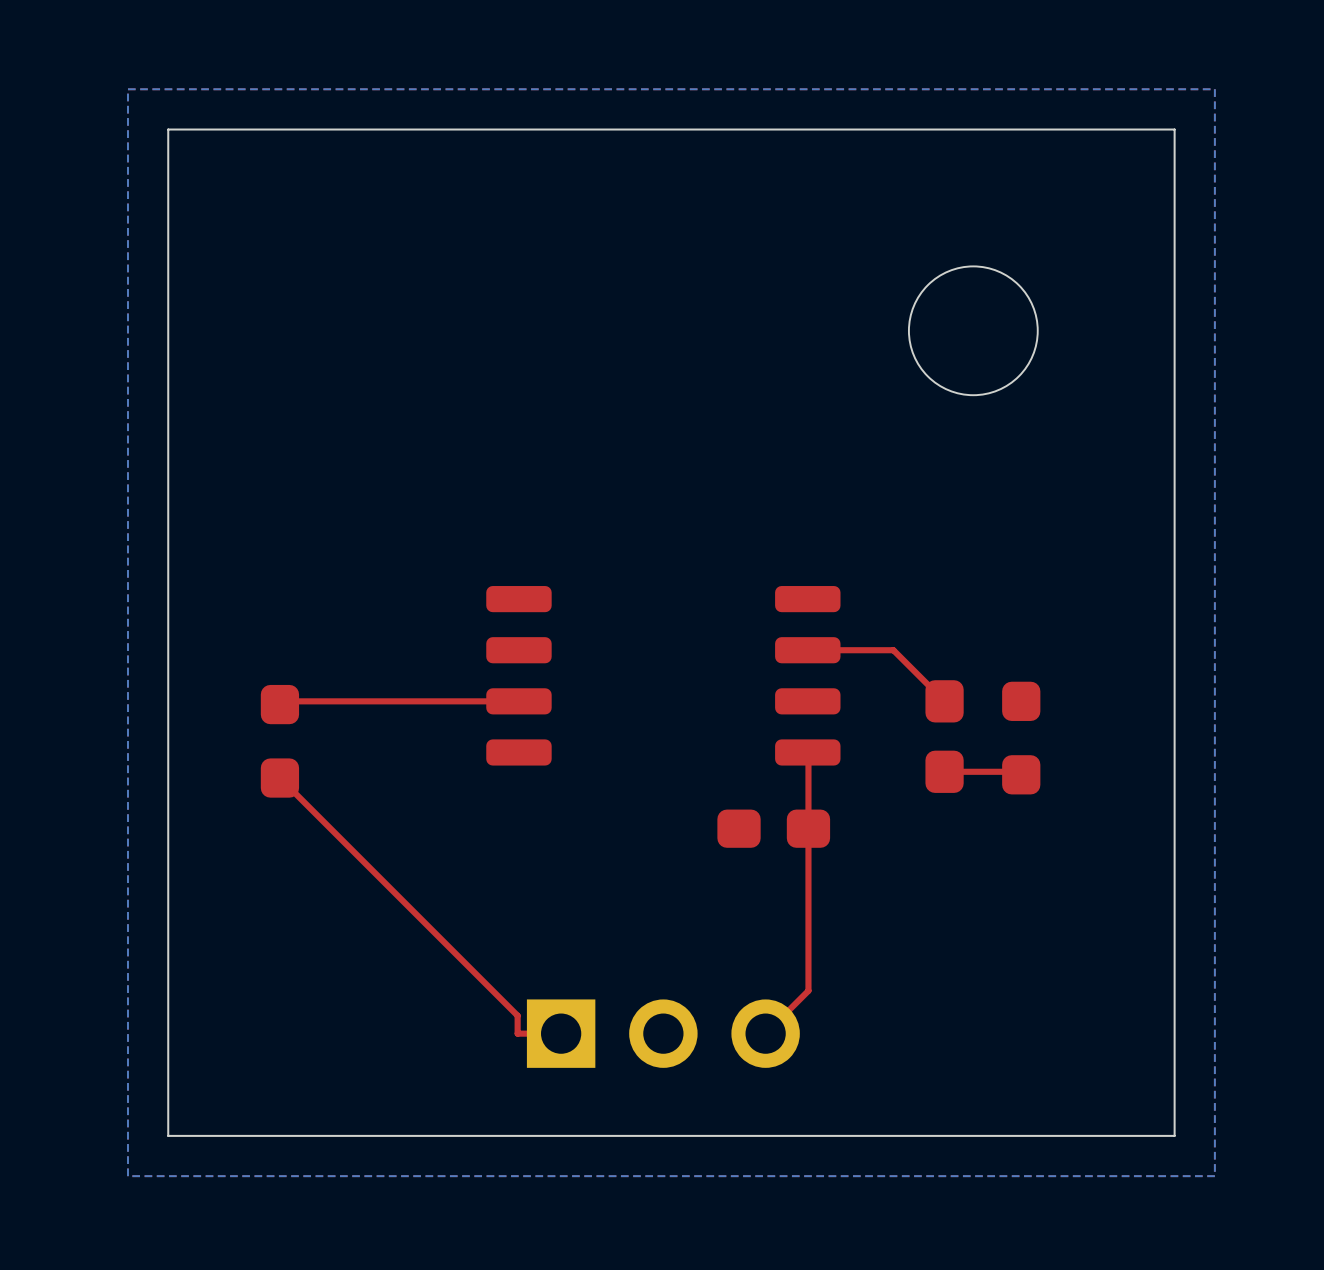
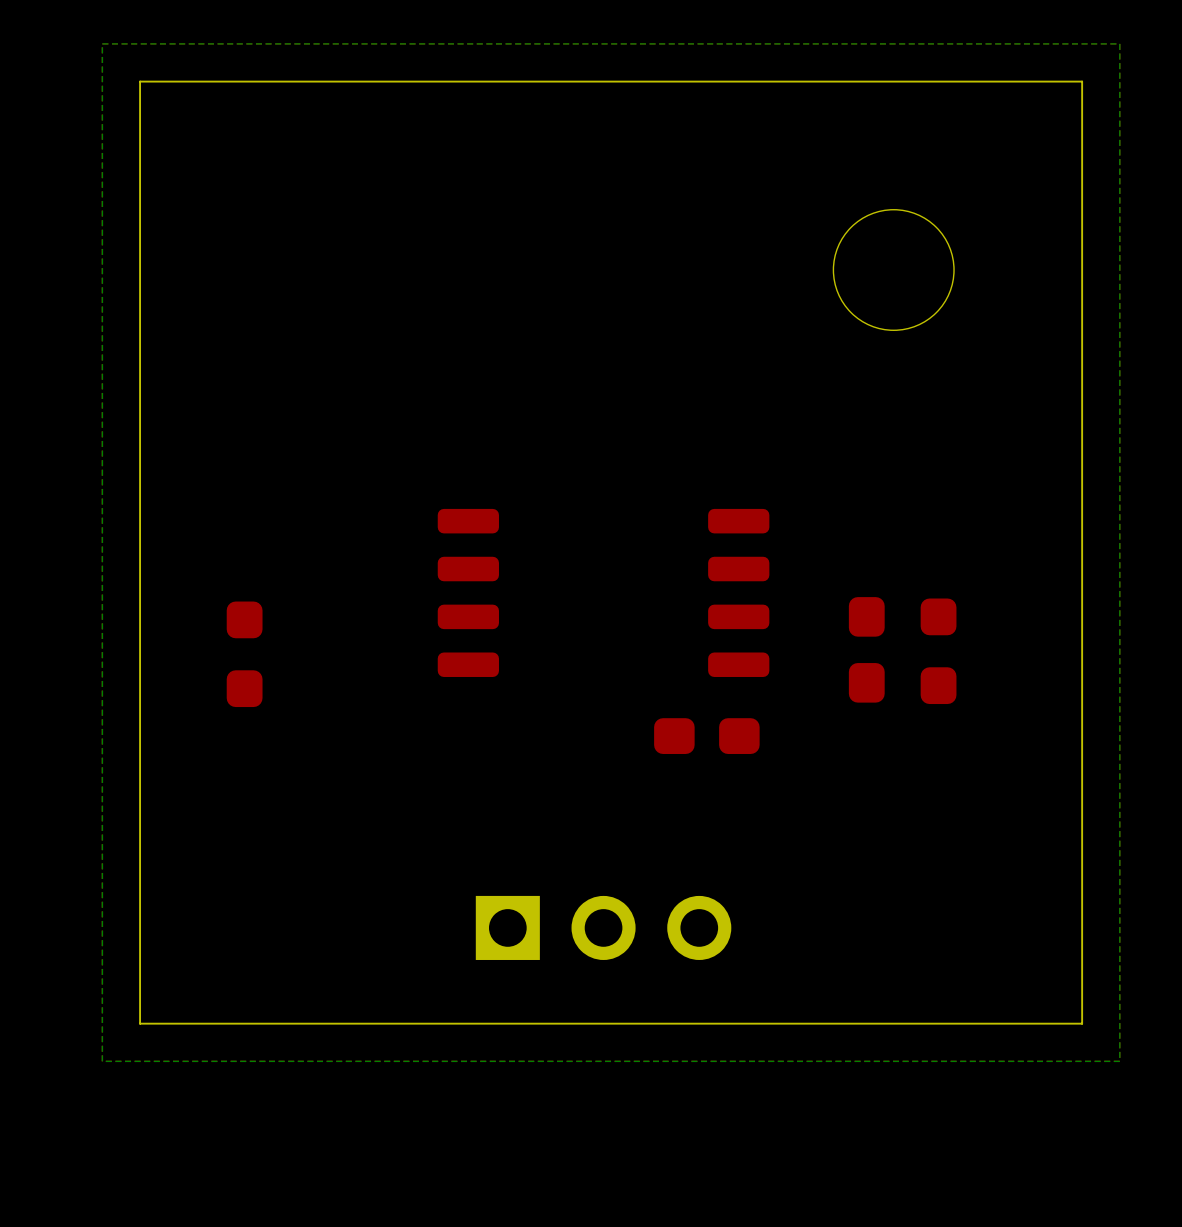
top track: (807, 650) (893, 650) (944, 701) -> none
top track: (518, 701) (283, 701) (279, 704) -> none
top track: (807, 752) (808, 990) (765, 1033) -> none
top track: (944, 771) (1018, 771) (1021, 774) -> none
top track: (279, 778) (517, 1015) (517, 1033) (561, 1033) -> none

